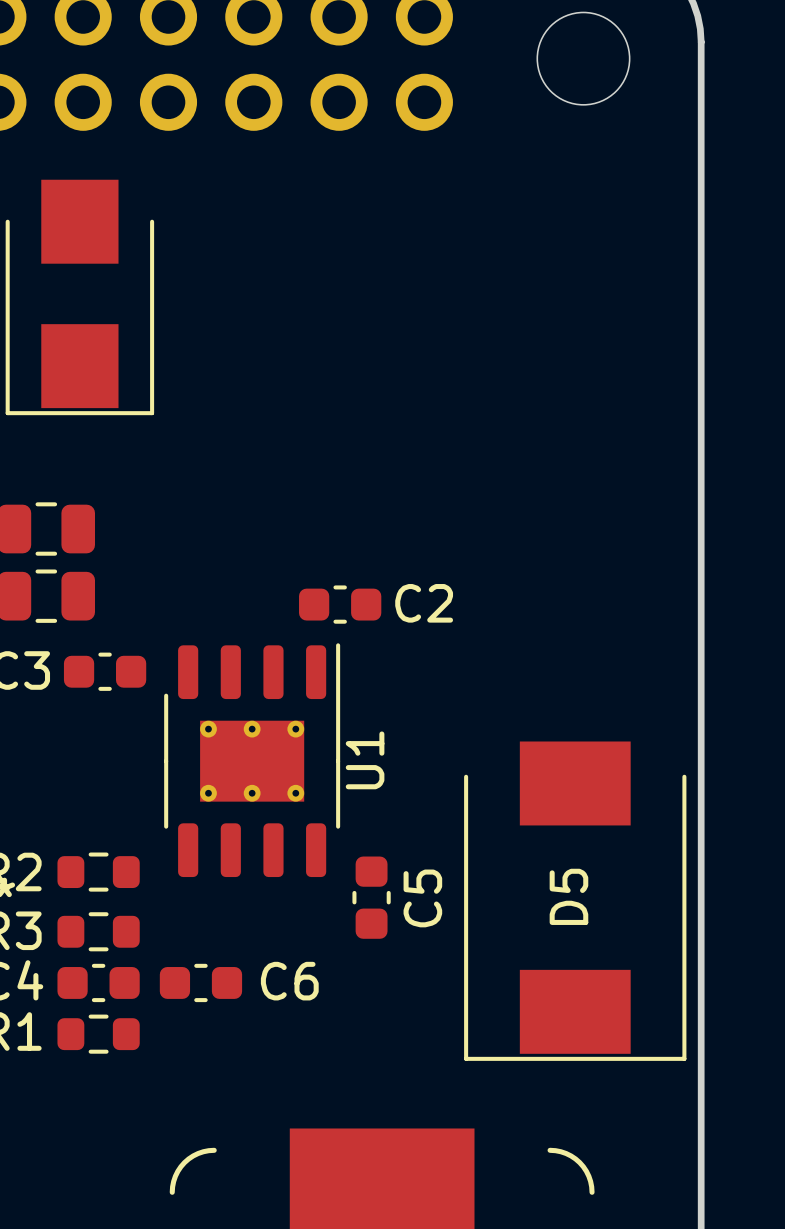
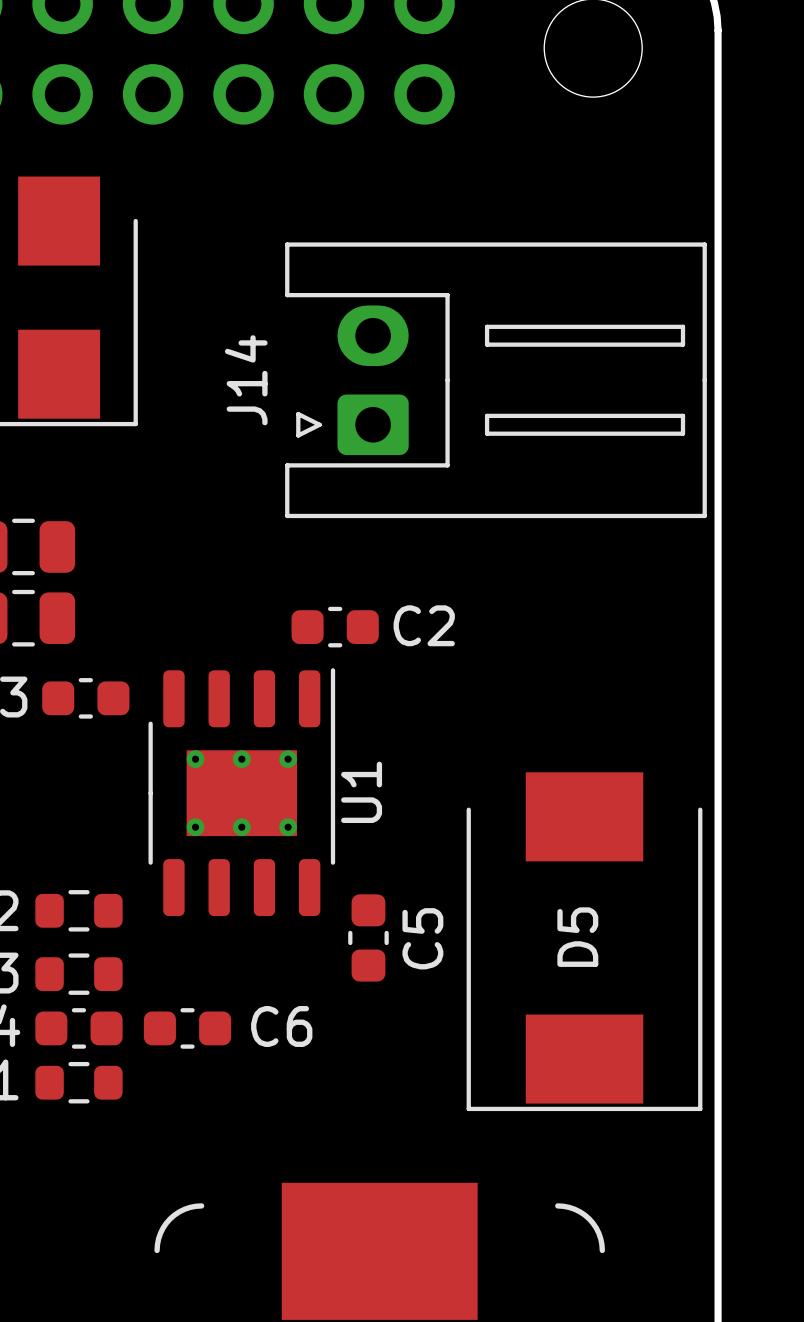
J14: none -> (495, 380)

